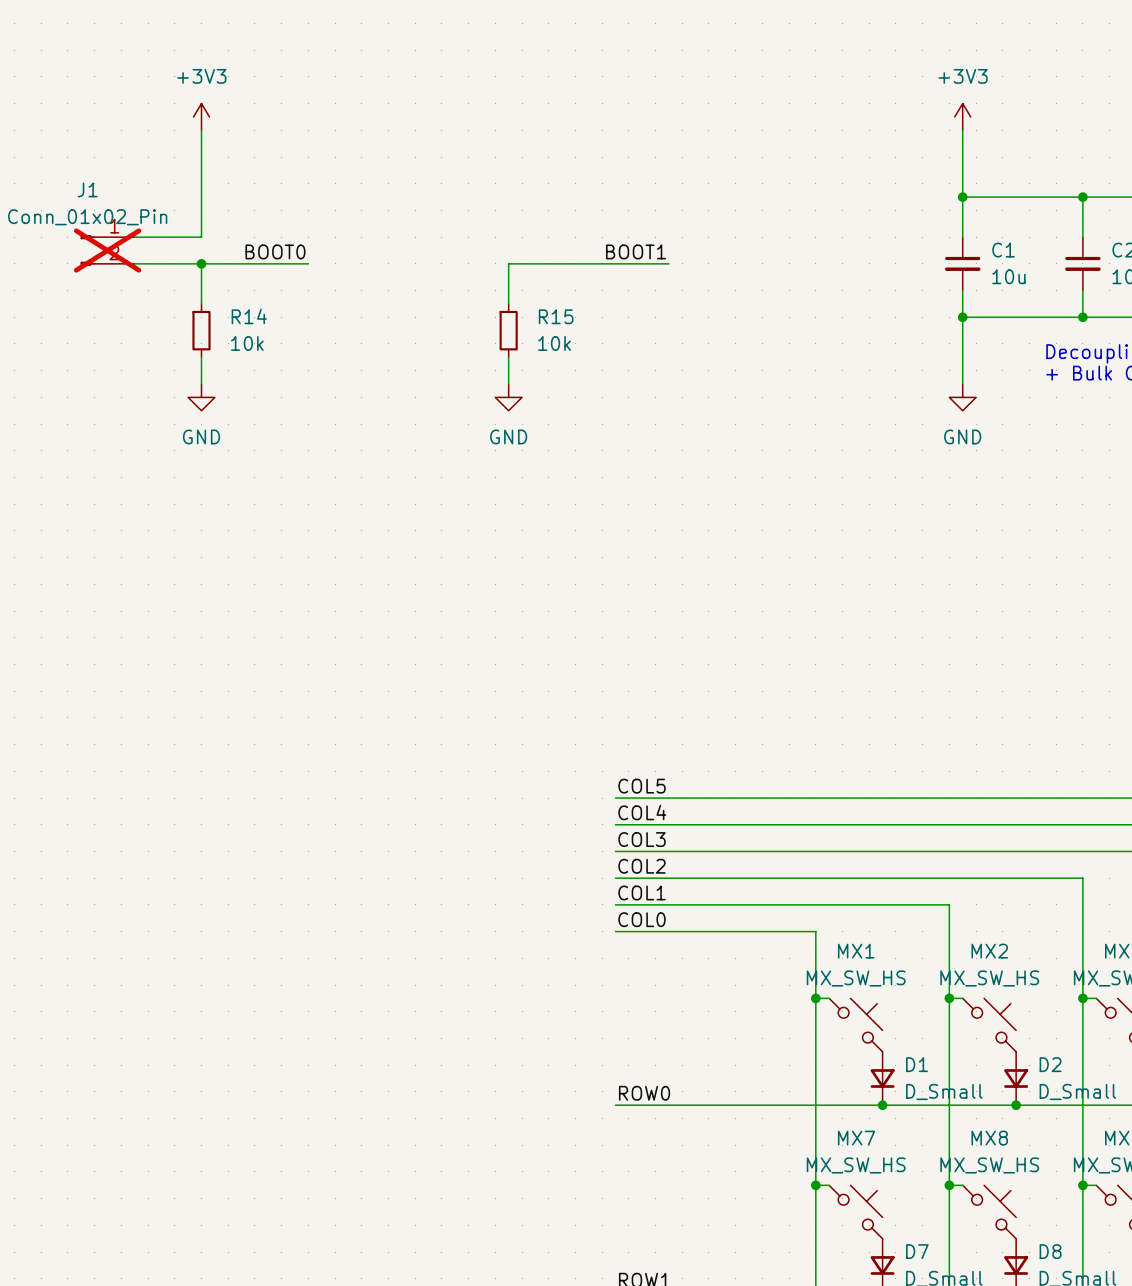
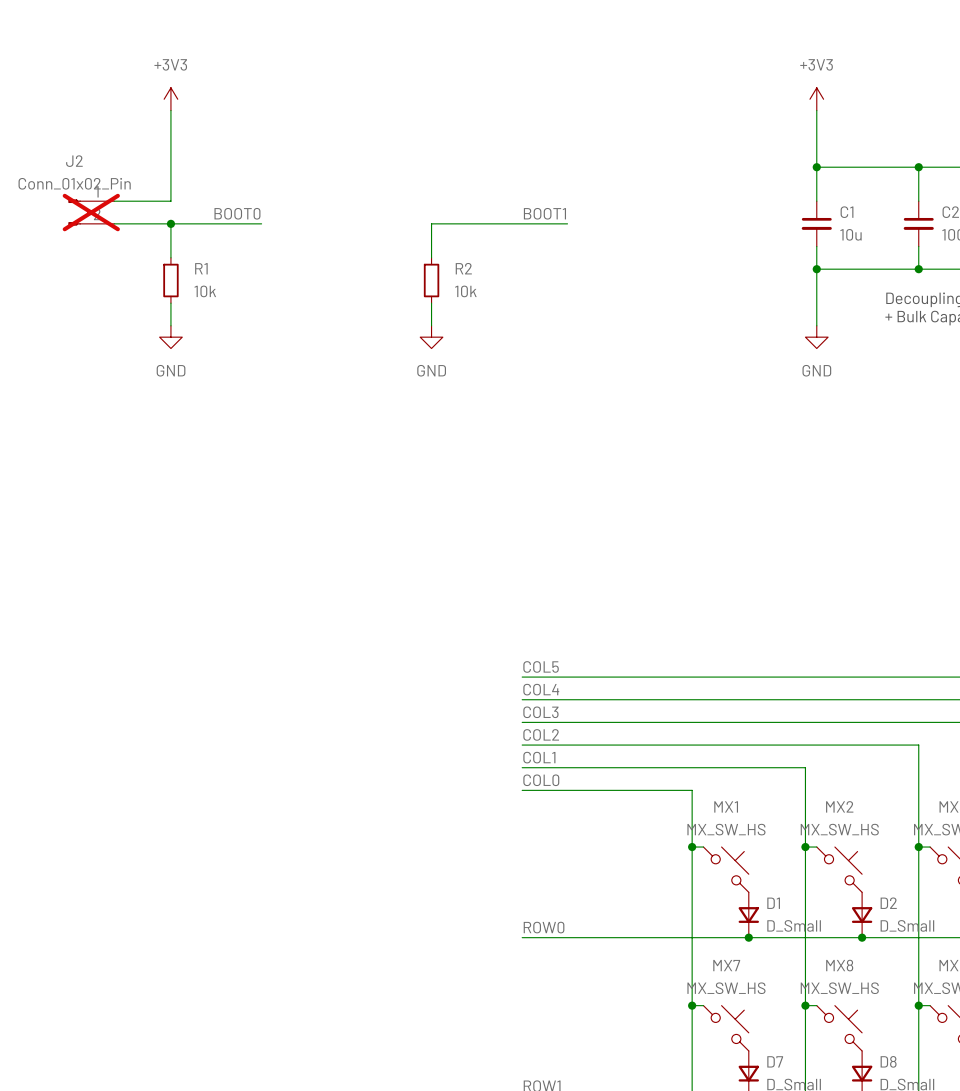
J1 name: J1 (87, 189) -> J2 (74, 161)
R14 name: R14 (249, 316) -> R1 (201, 268)
R15 name: R15 (556, 316) -> R2 (463, 268)

